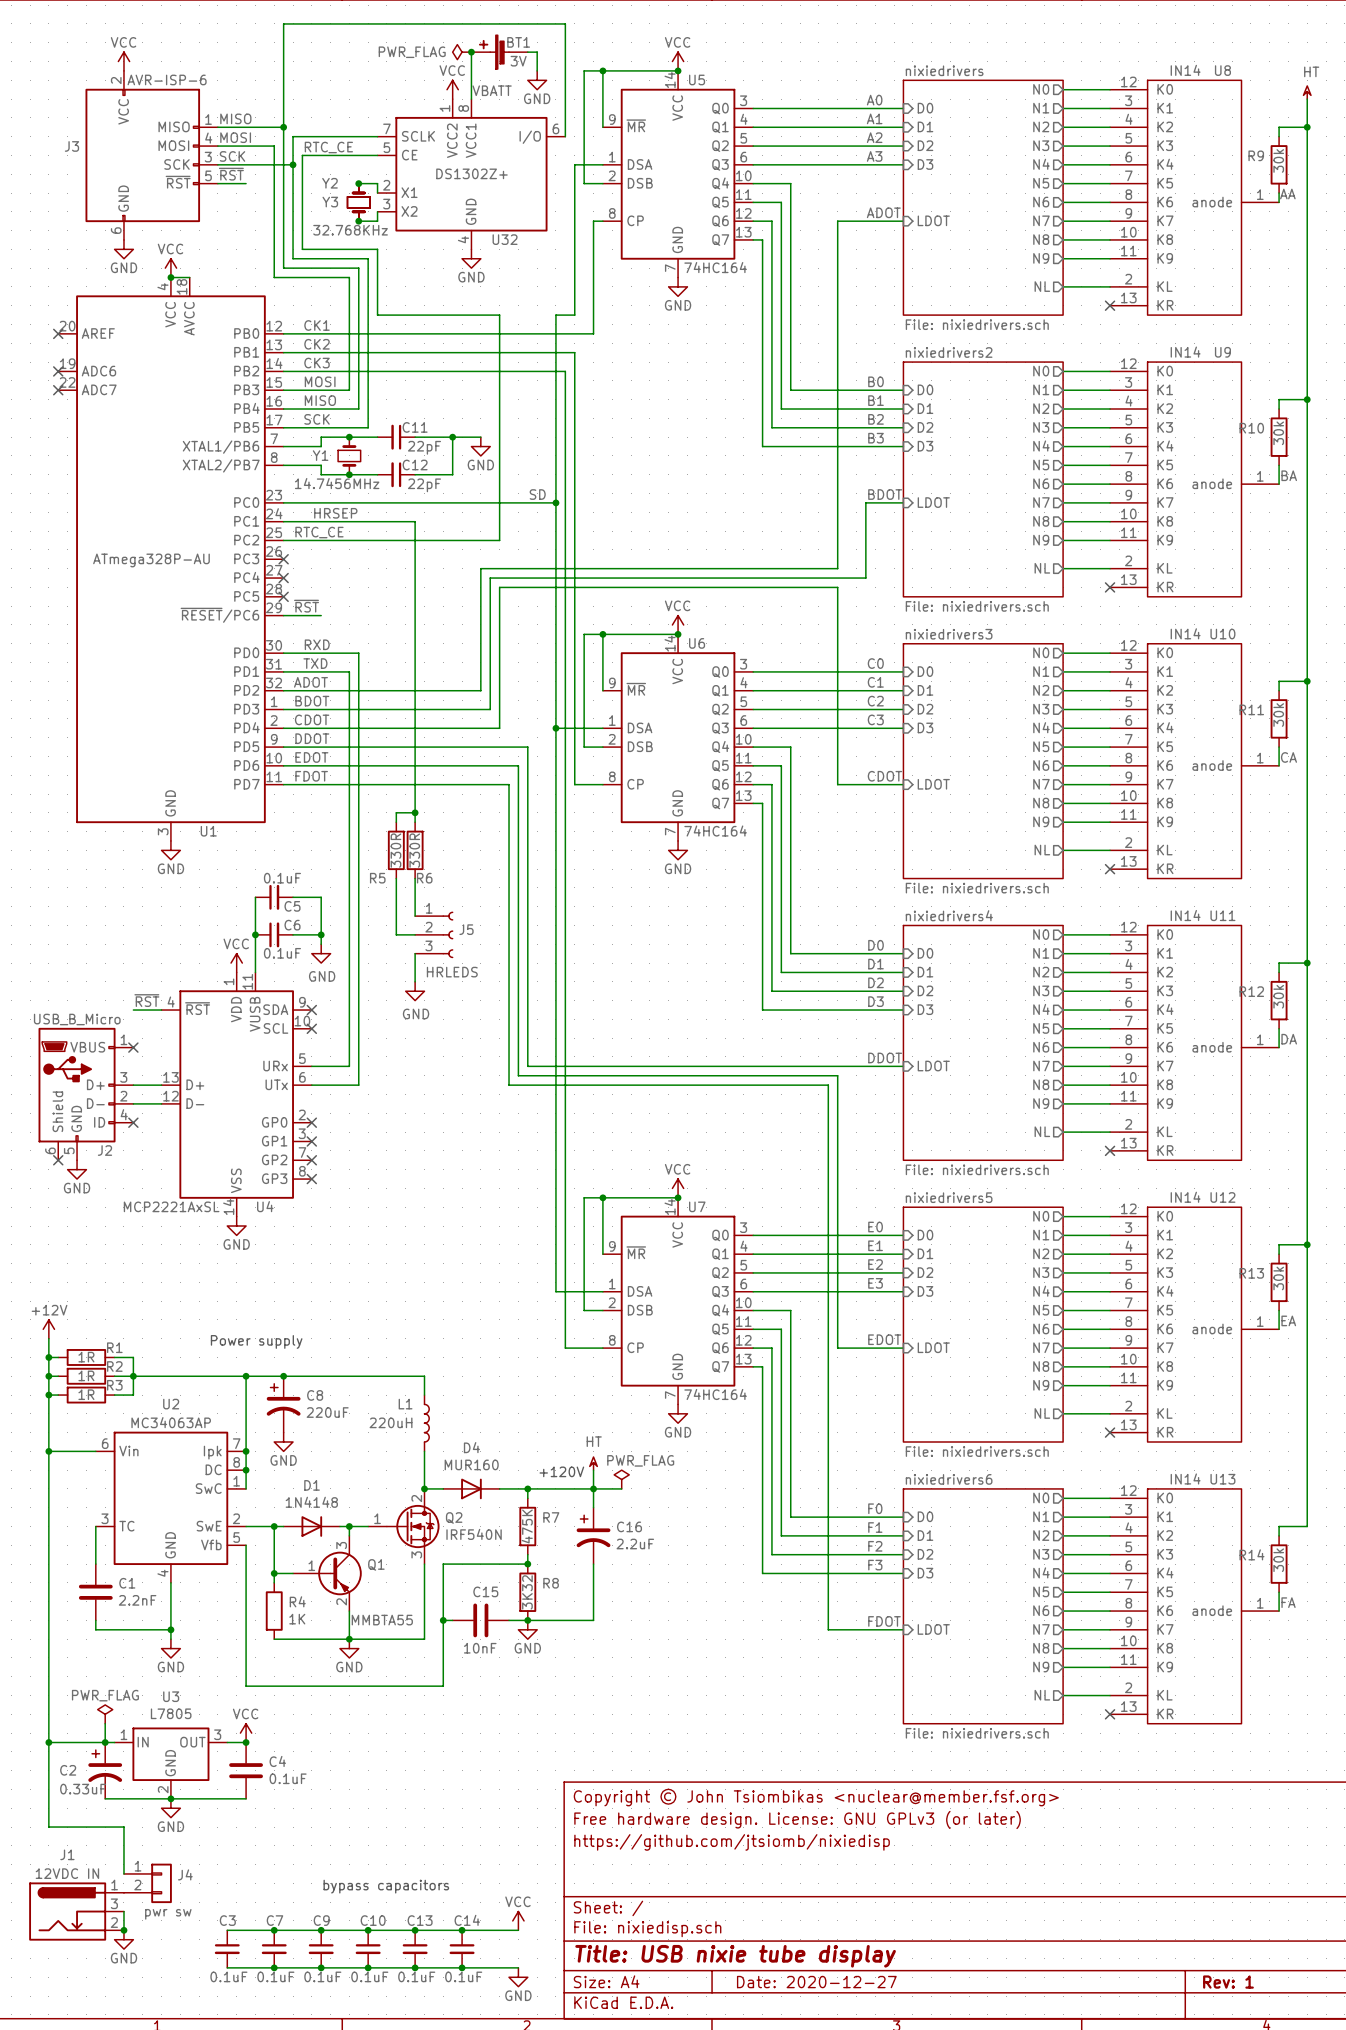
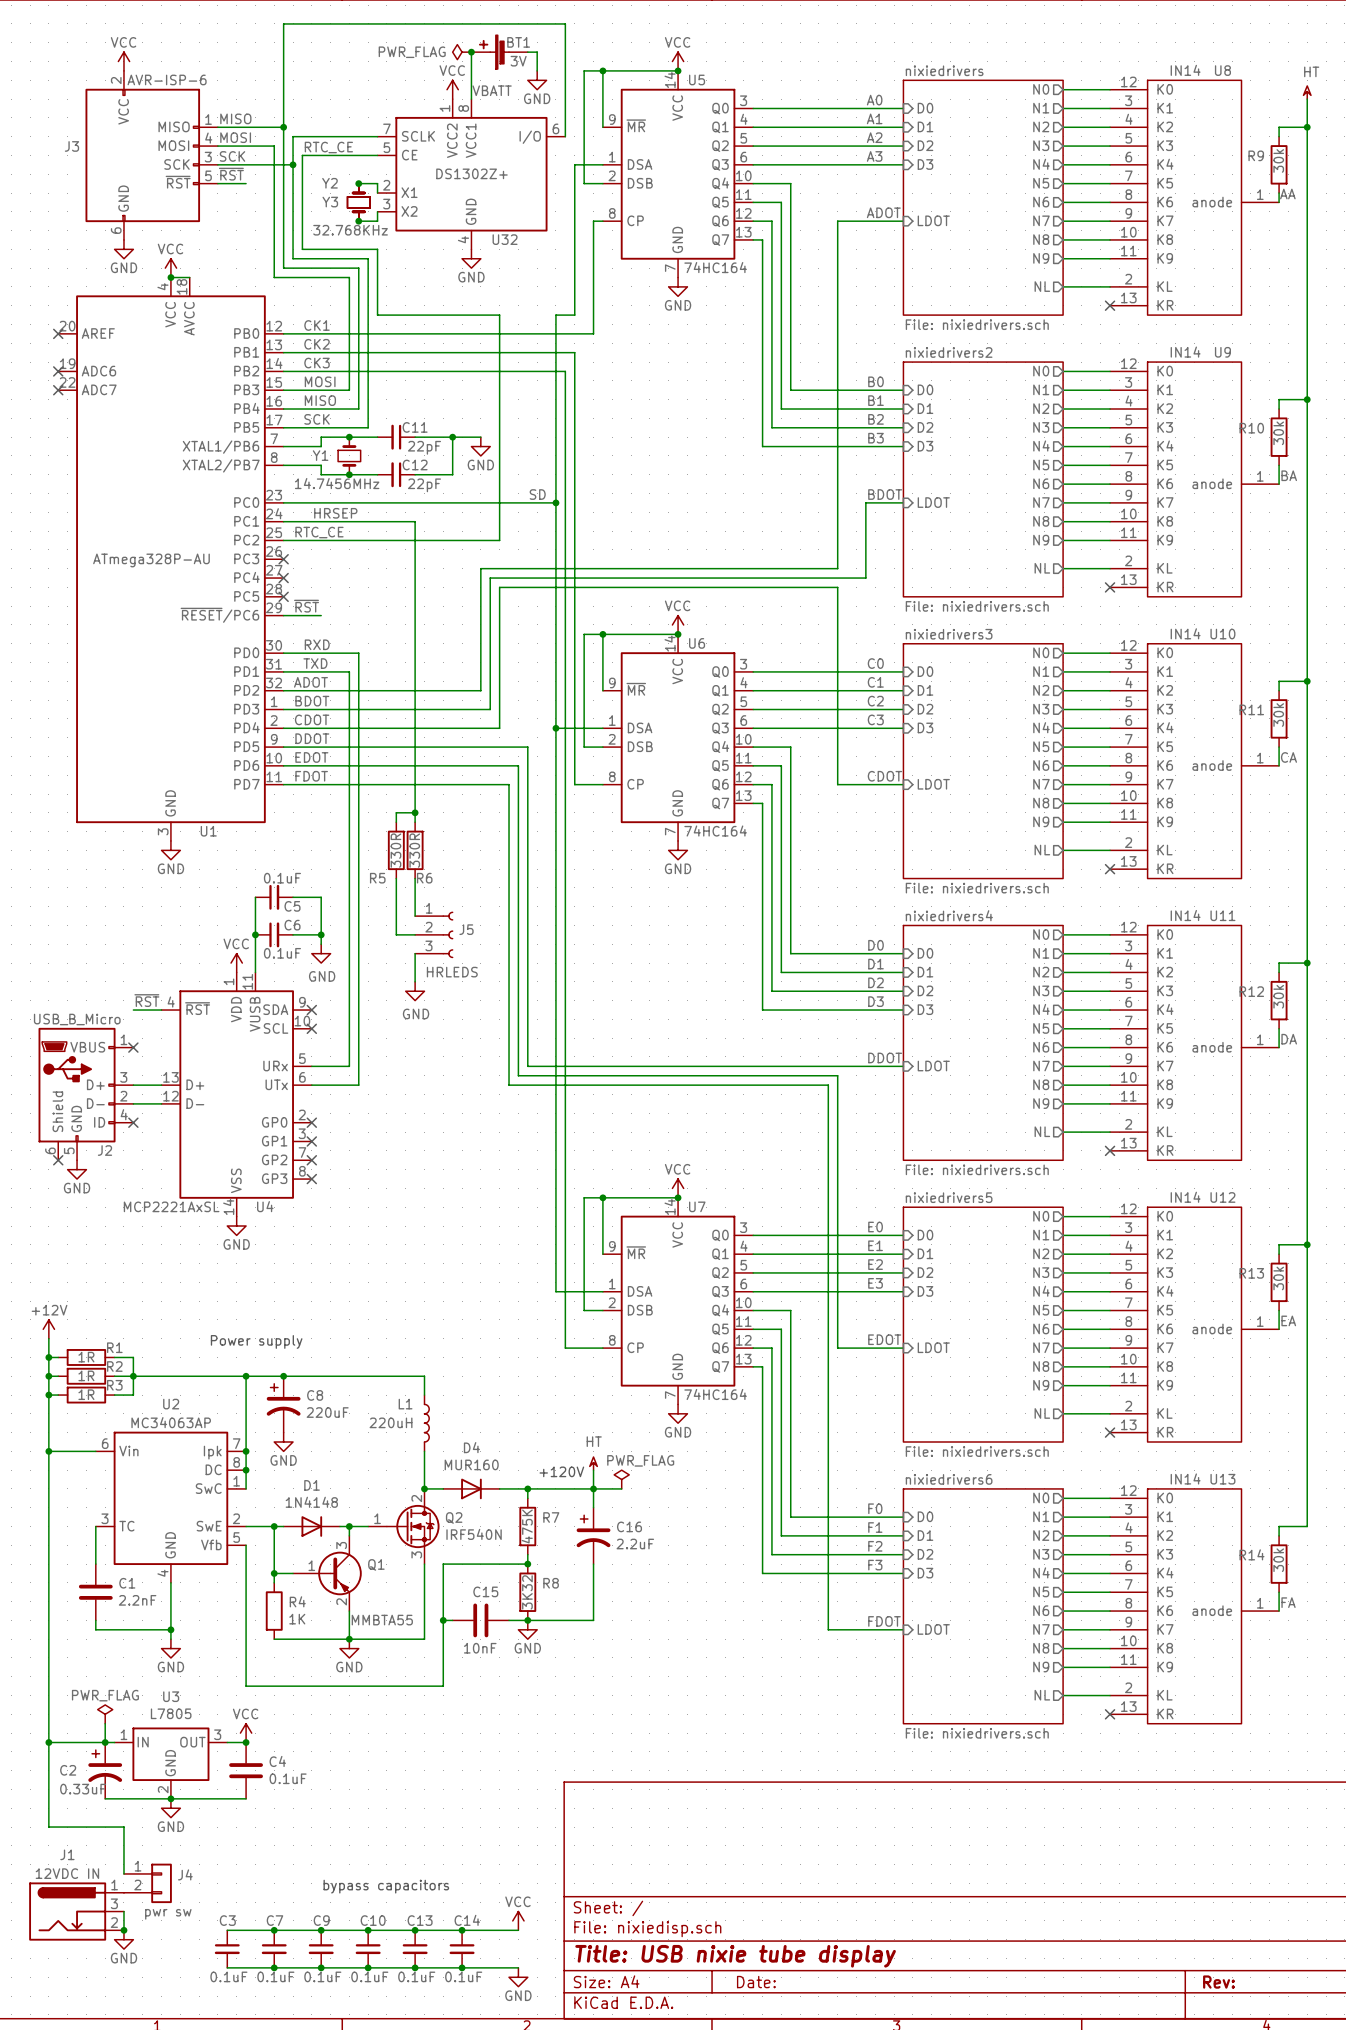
title block: Copyright © John Tsiombikas <nuclear@member.fsf.org> (816, 1797) -> none
title block: Free hardware design. License: GNU GPLv3 (or later) (797, 1819) -> none
title block: https://github.com/jtsiomb/nixiedisp (732, 1842) -> none
title block: Date: 2020-12-27 (816, 1982) -> Date: (756, 1982)
title block: Rev: 1 (1228, 1982) -> Rev: (1218, 1982)

